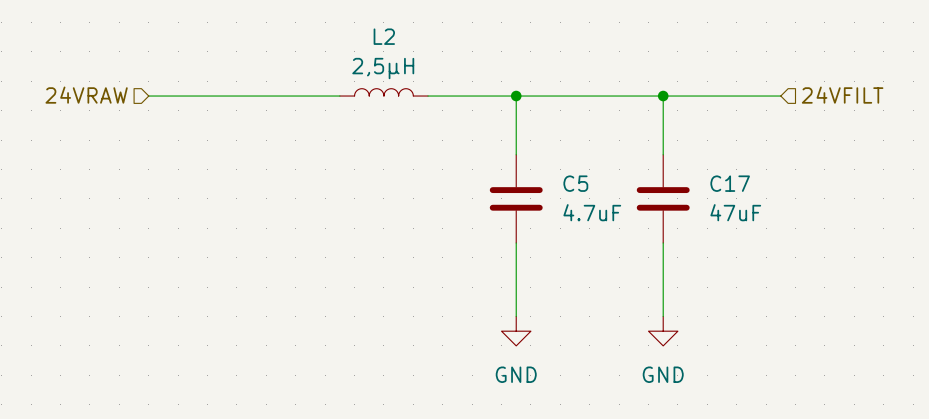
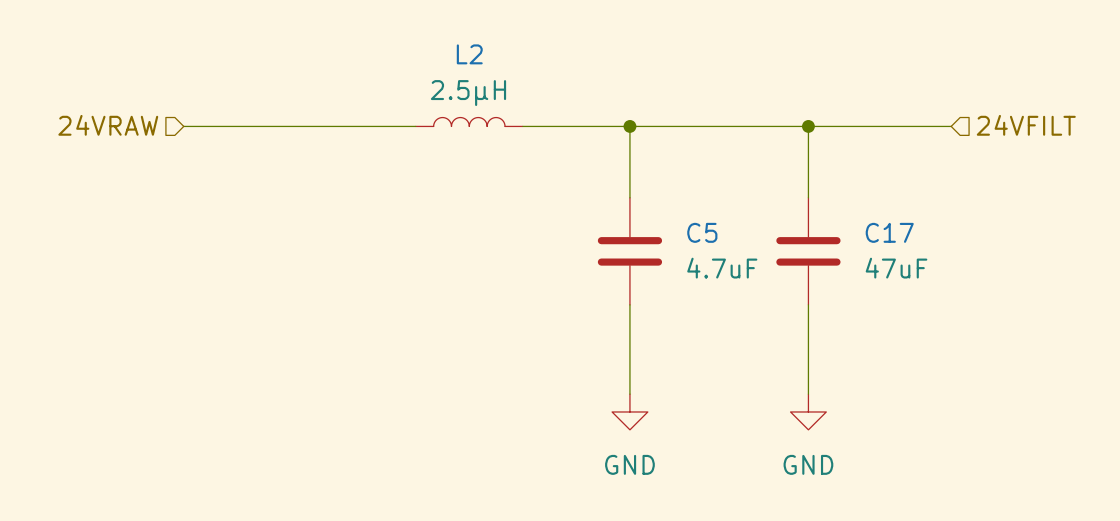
L2 value: 2,5µH (383, 68) -> 2.5µH (468, 93)

